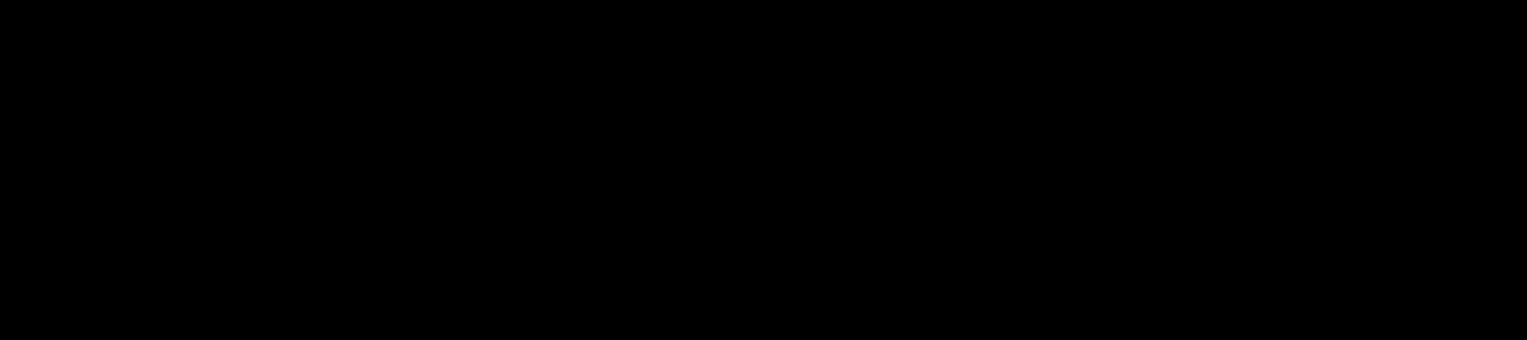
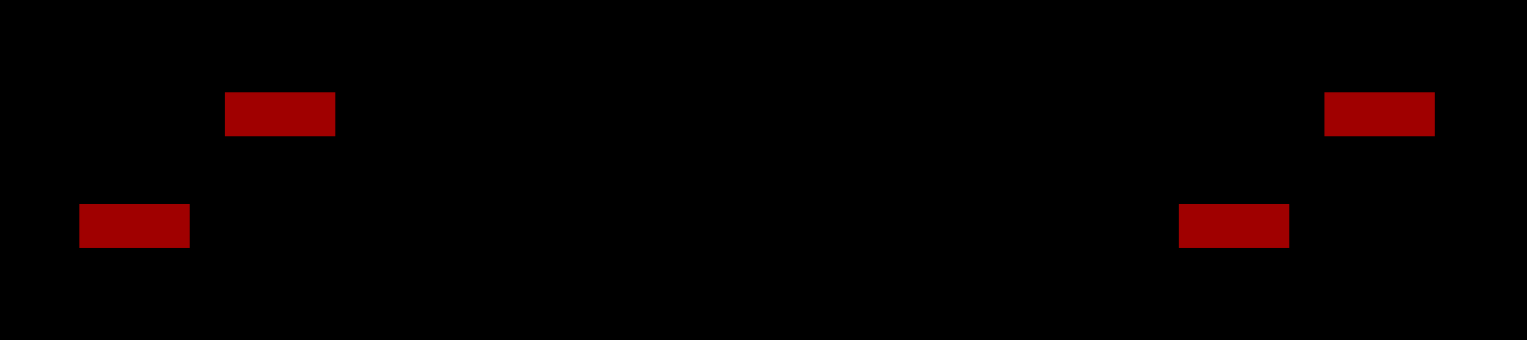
part: none -> (207, 170)
part: none -> (1306, 170)

